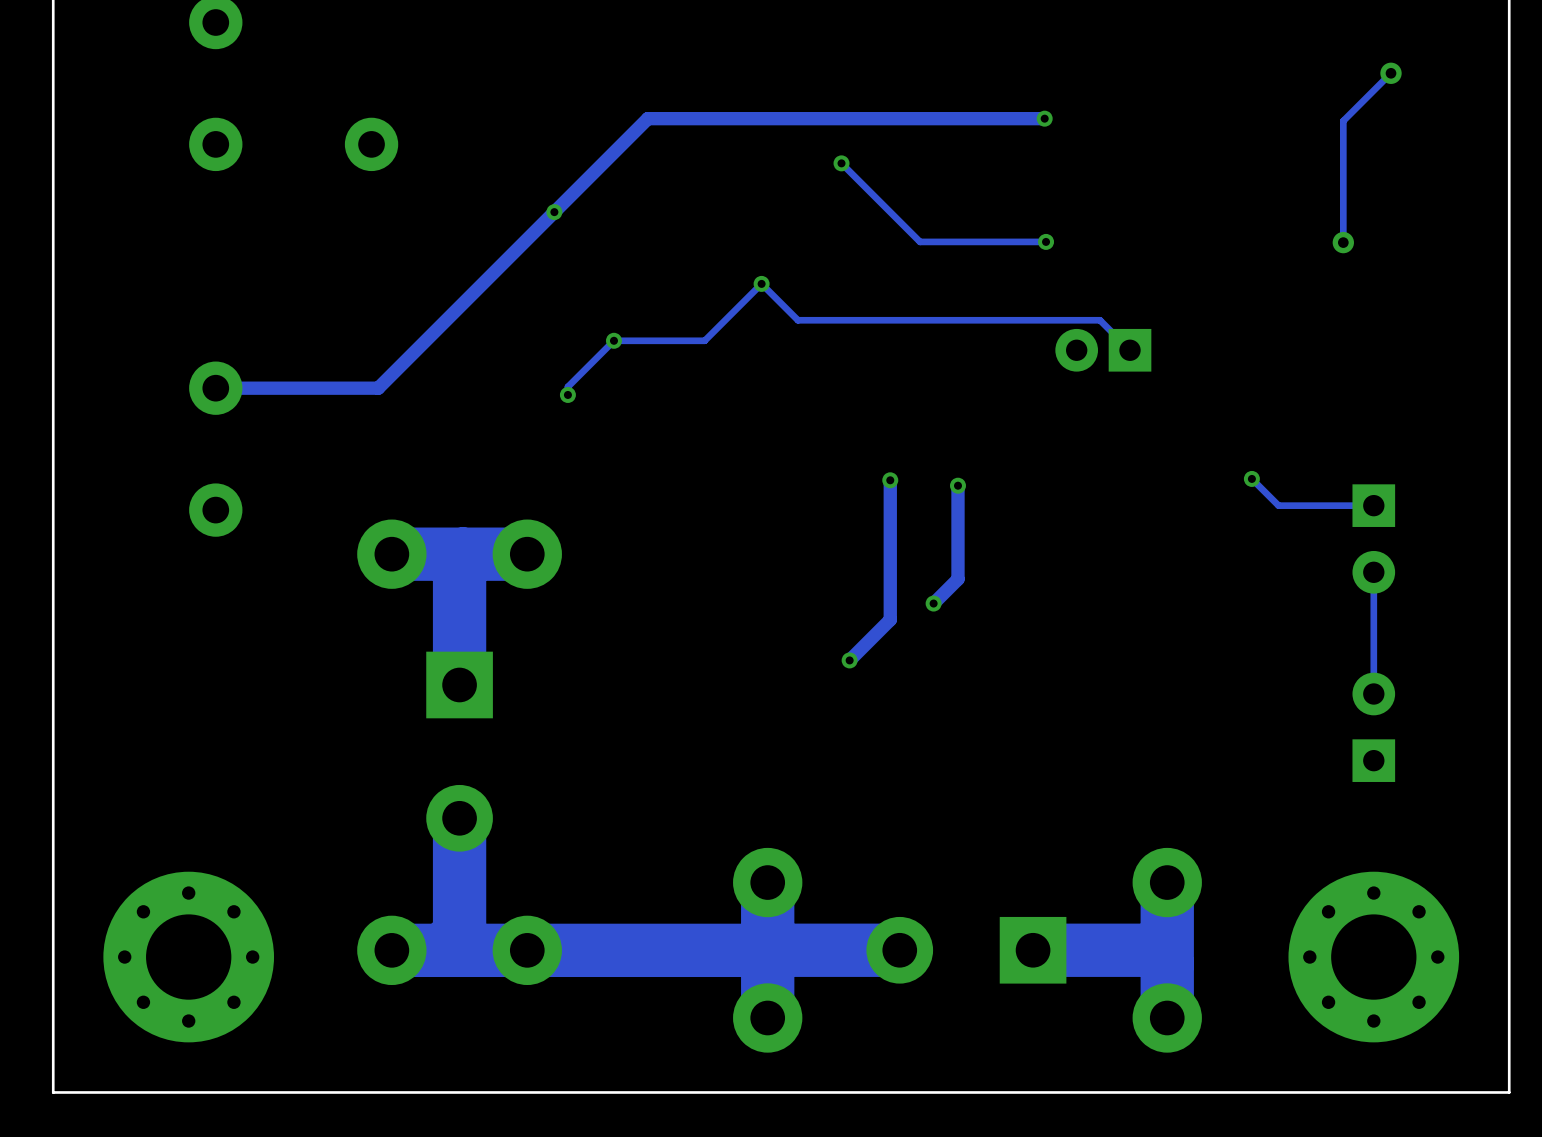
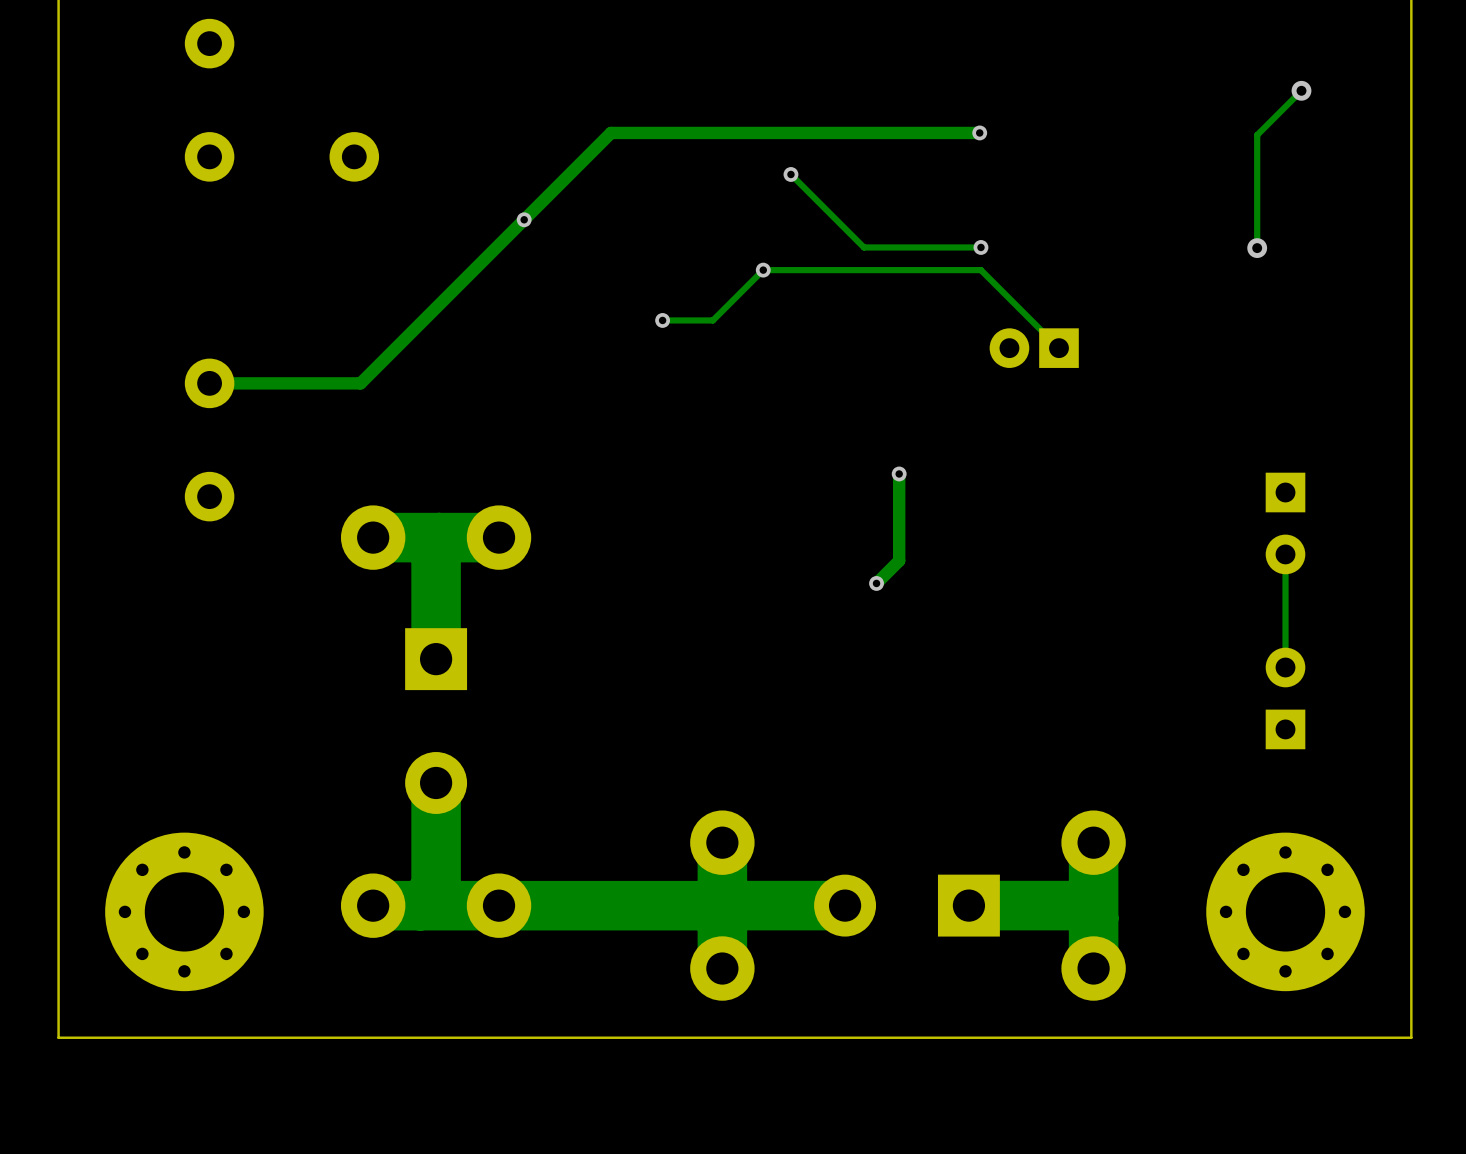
via: none -> (763, 270)
via: (761, 283) -> none
via: none -> (662, 320)
track: (1100, 320) (797, 320) (761, 283) (704, 340) (613, 340) (567, 386) (567, 394) -> (1031, 320) (980, 270) (763, 270) (712, 320) (662, 320)
via: (613, 340) -> none
via: (567, 394) -> none
track: (1251, 478) (1278, 505) (1373, 505) -> none
via: (1251, 478) -> none
track: (890, 480) (890, 619) (849, 660) -> none
via: (890, 480) -> none
via: (849, 660) -> none

